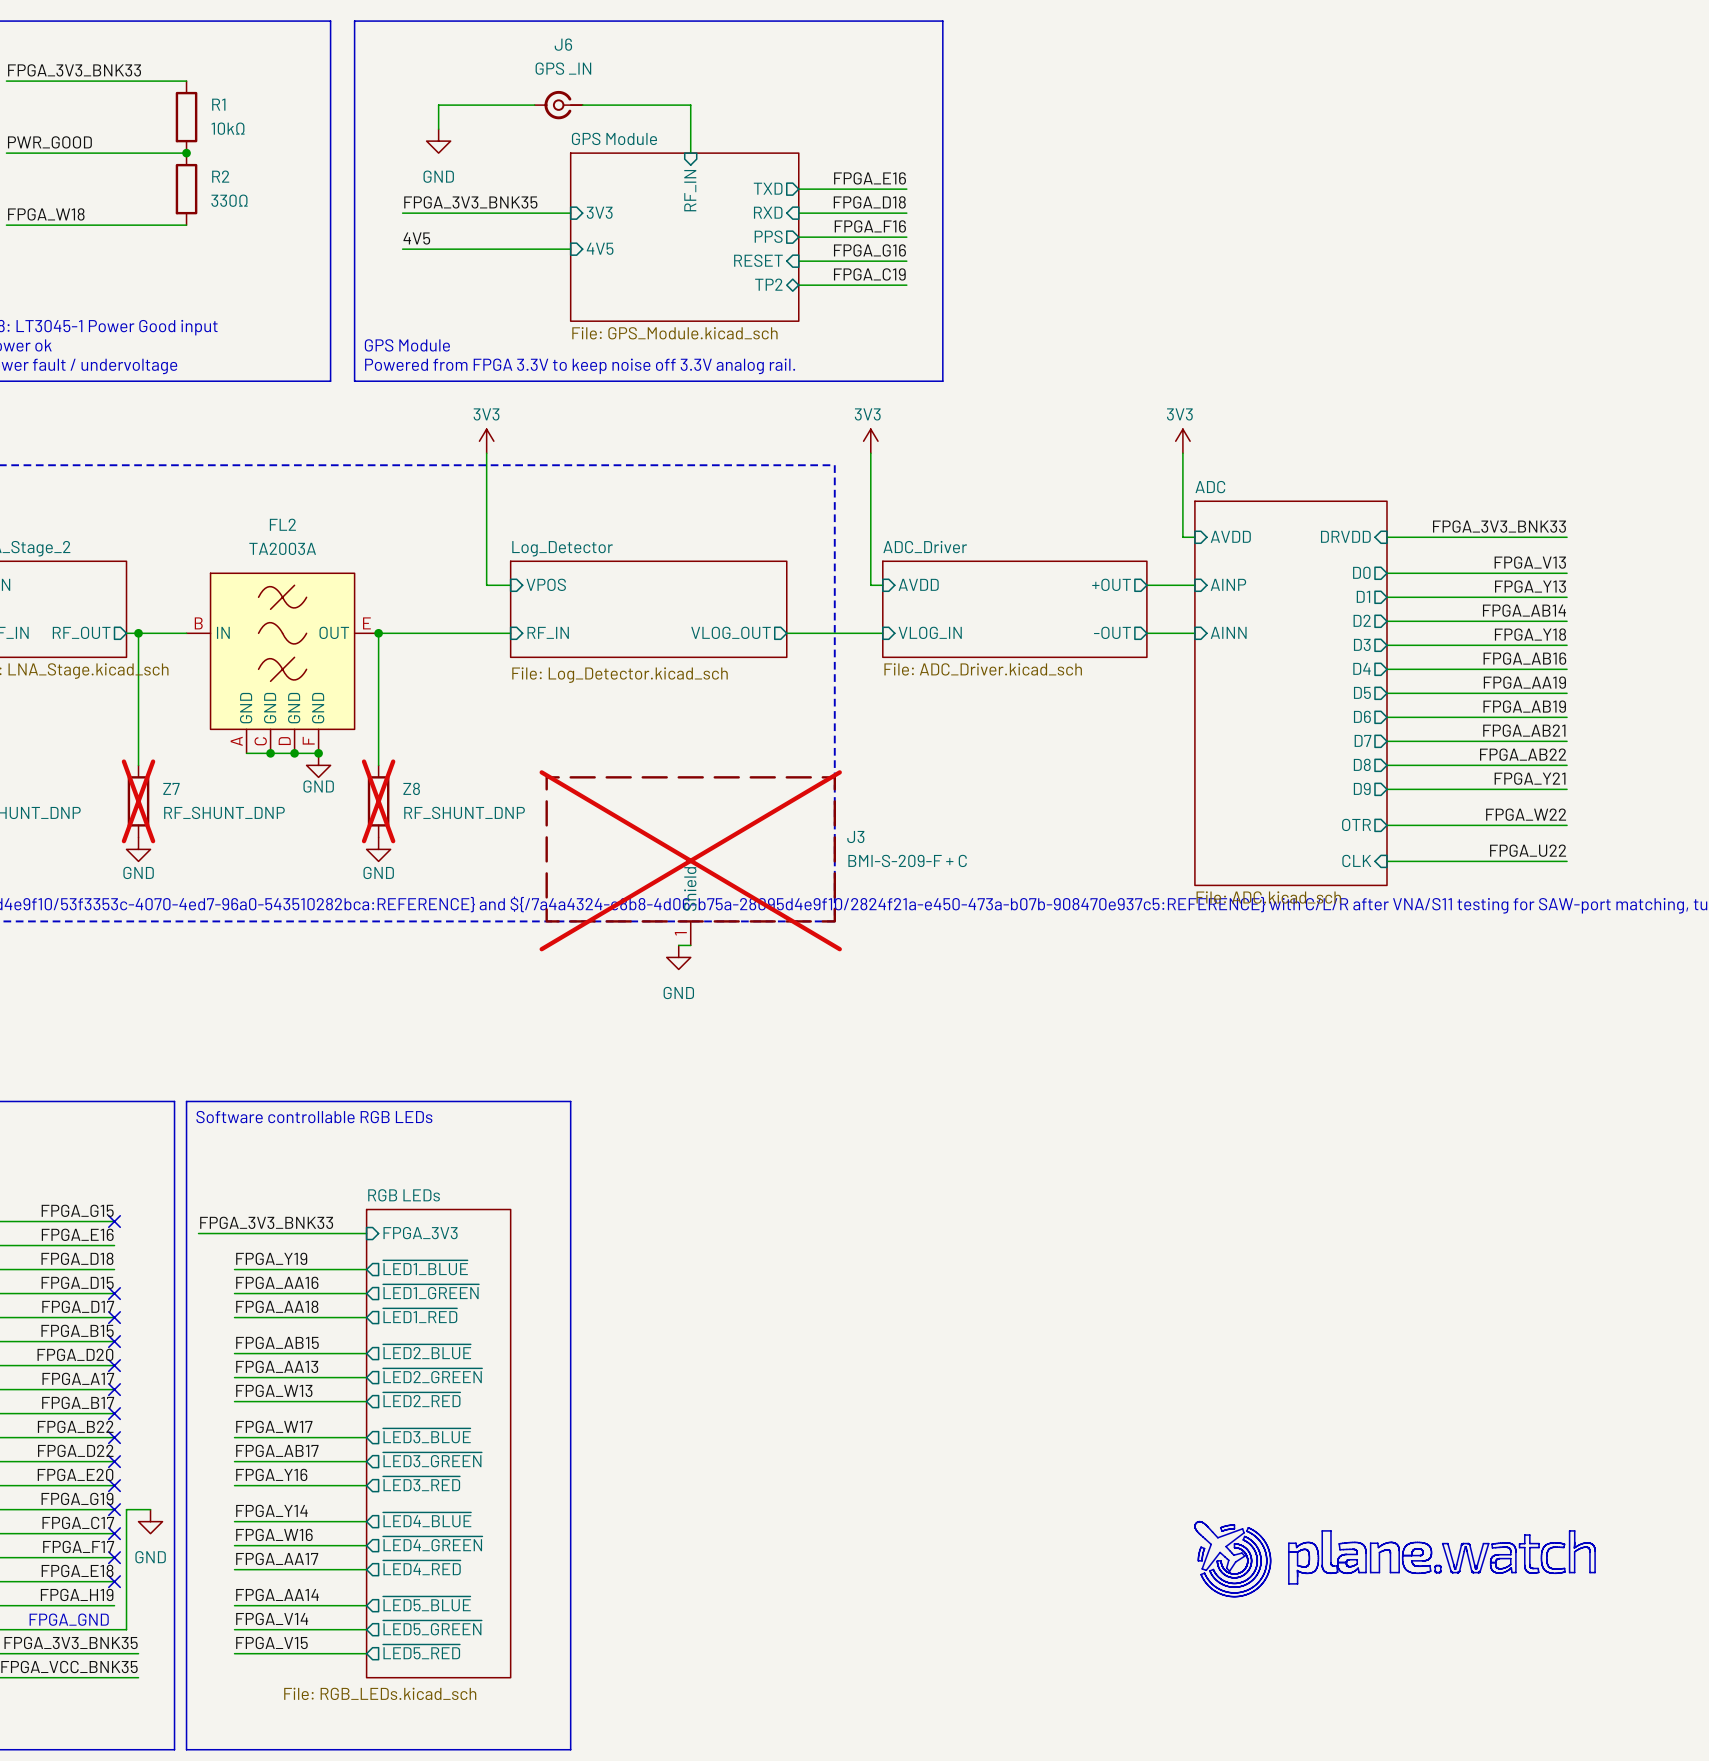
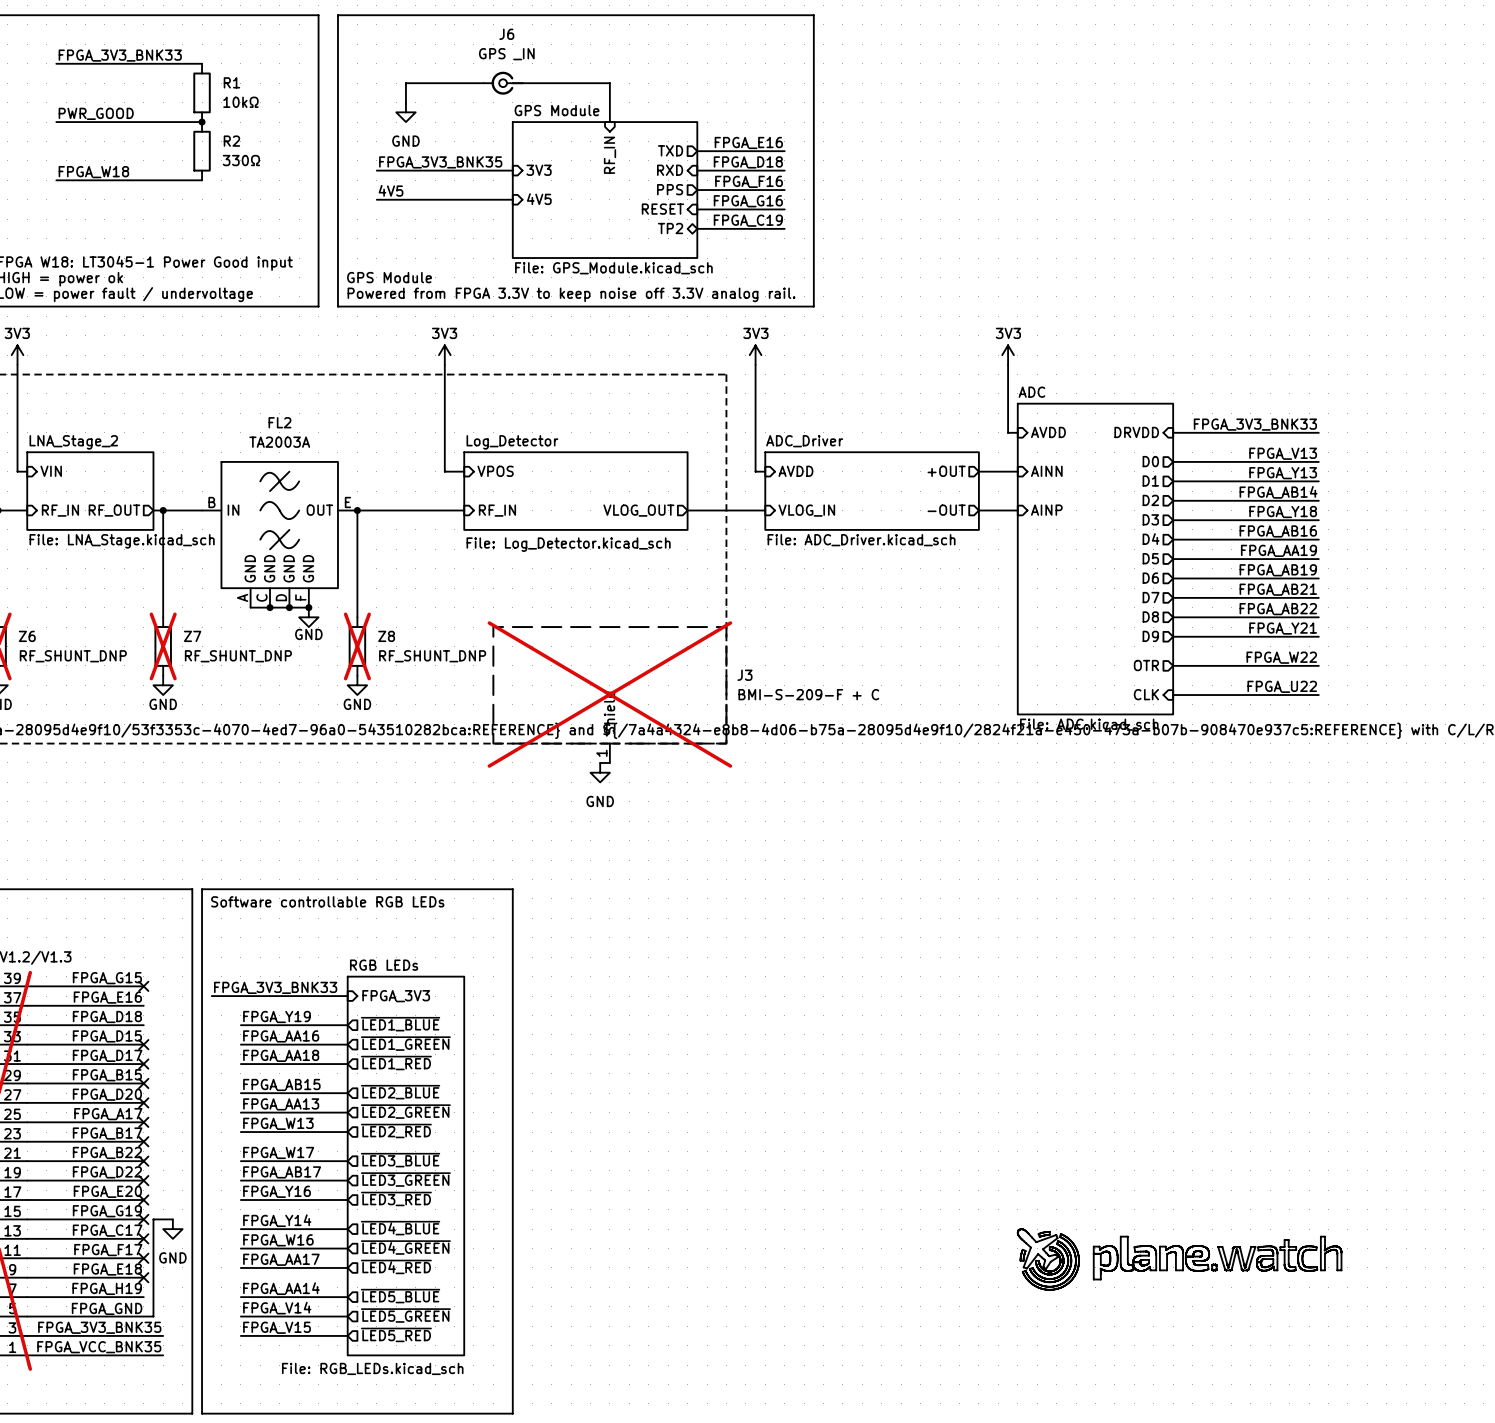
sheet pin: AINP (1228, 584) -> AINN (1046, 471)
sheet pin: AINN (1228, 632) -> AINP (1046, 510)

